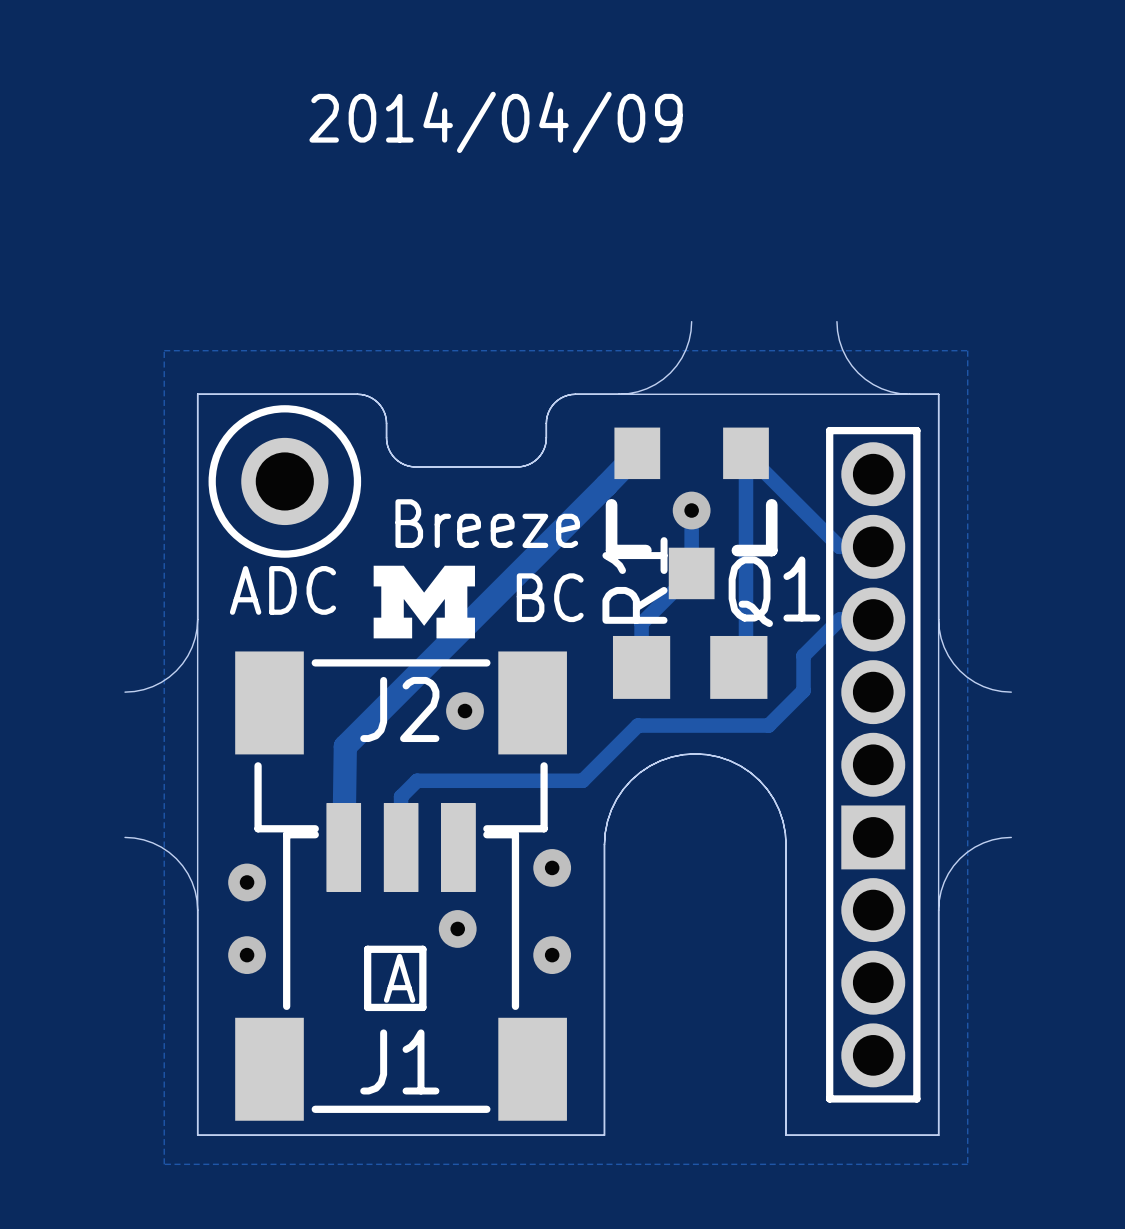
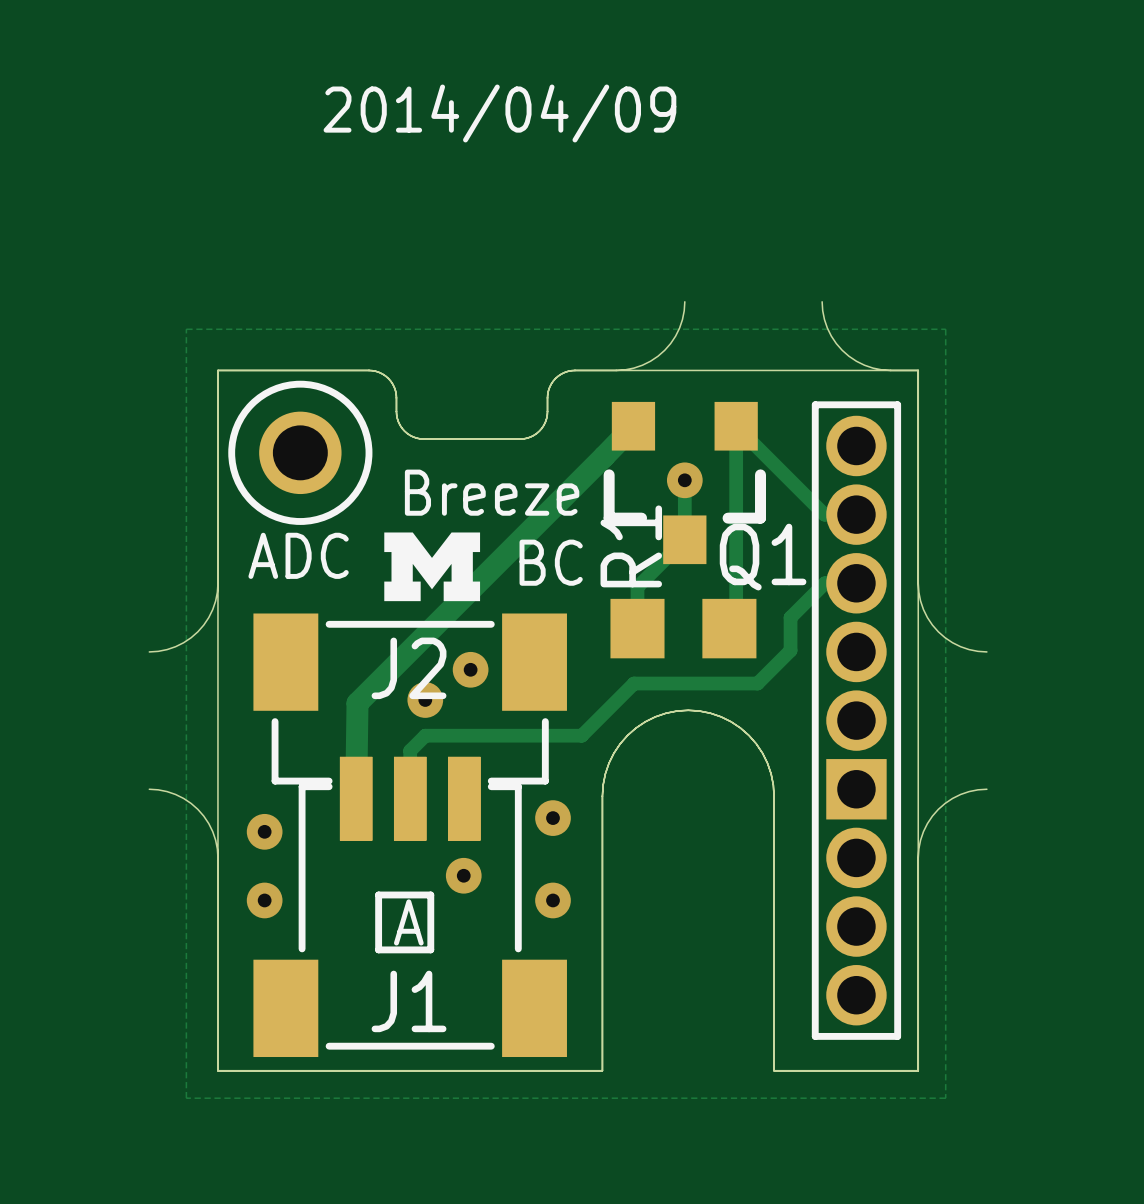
via: none -> (425, 700)

